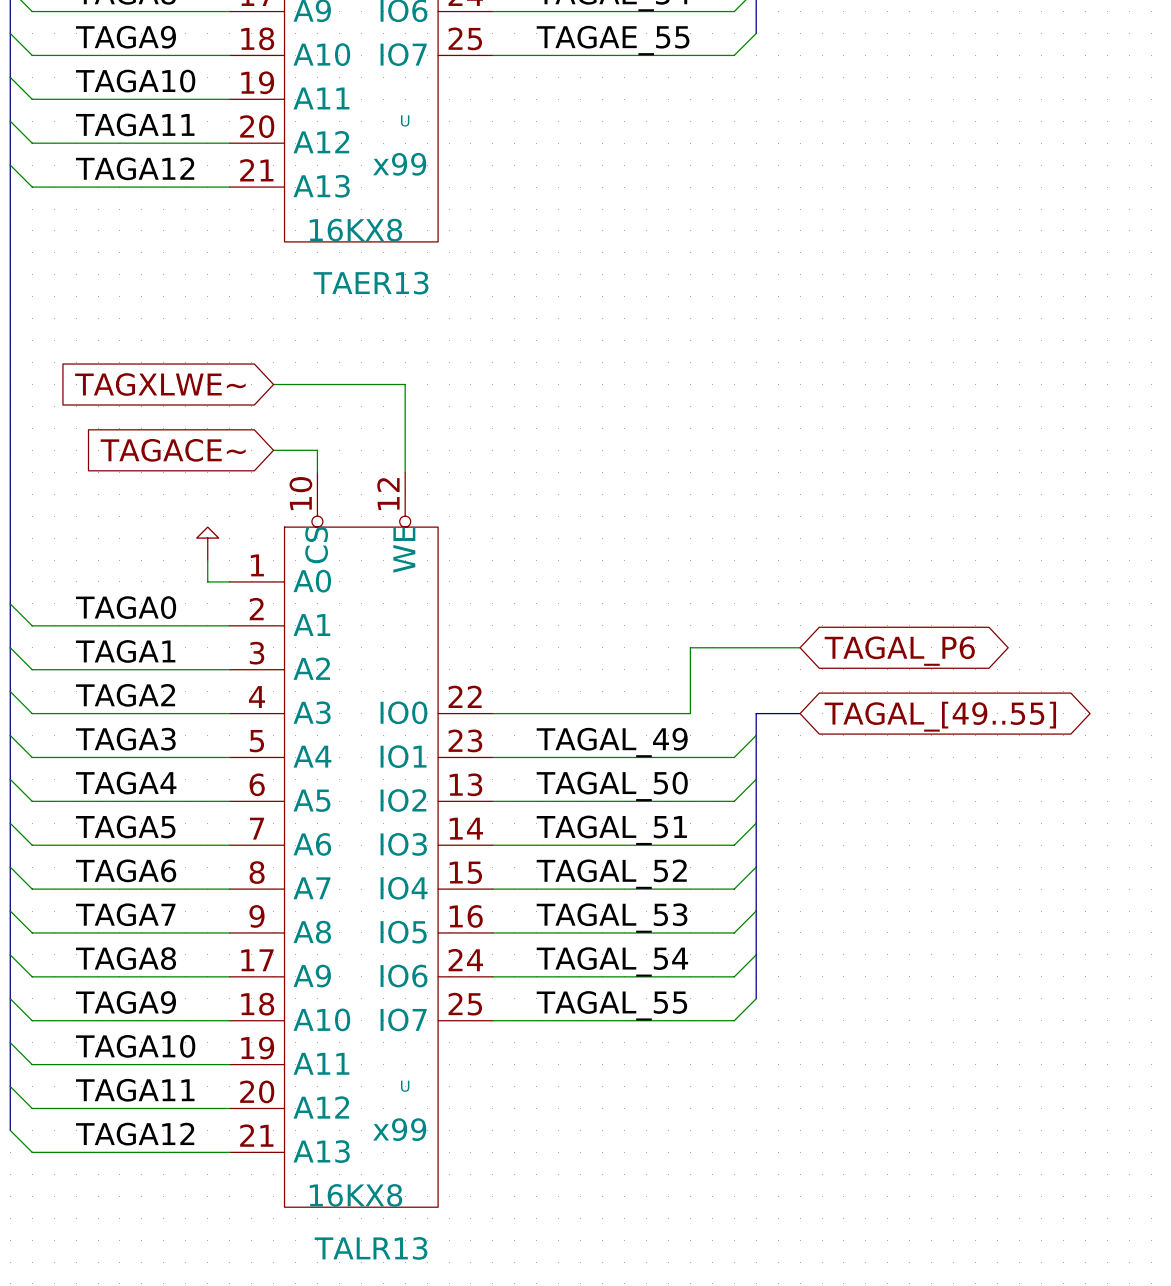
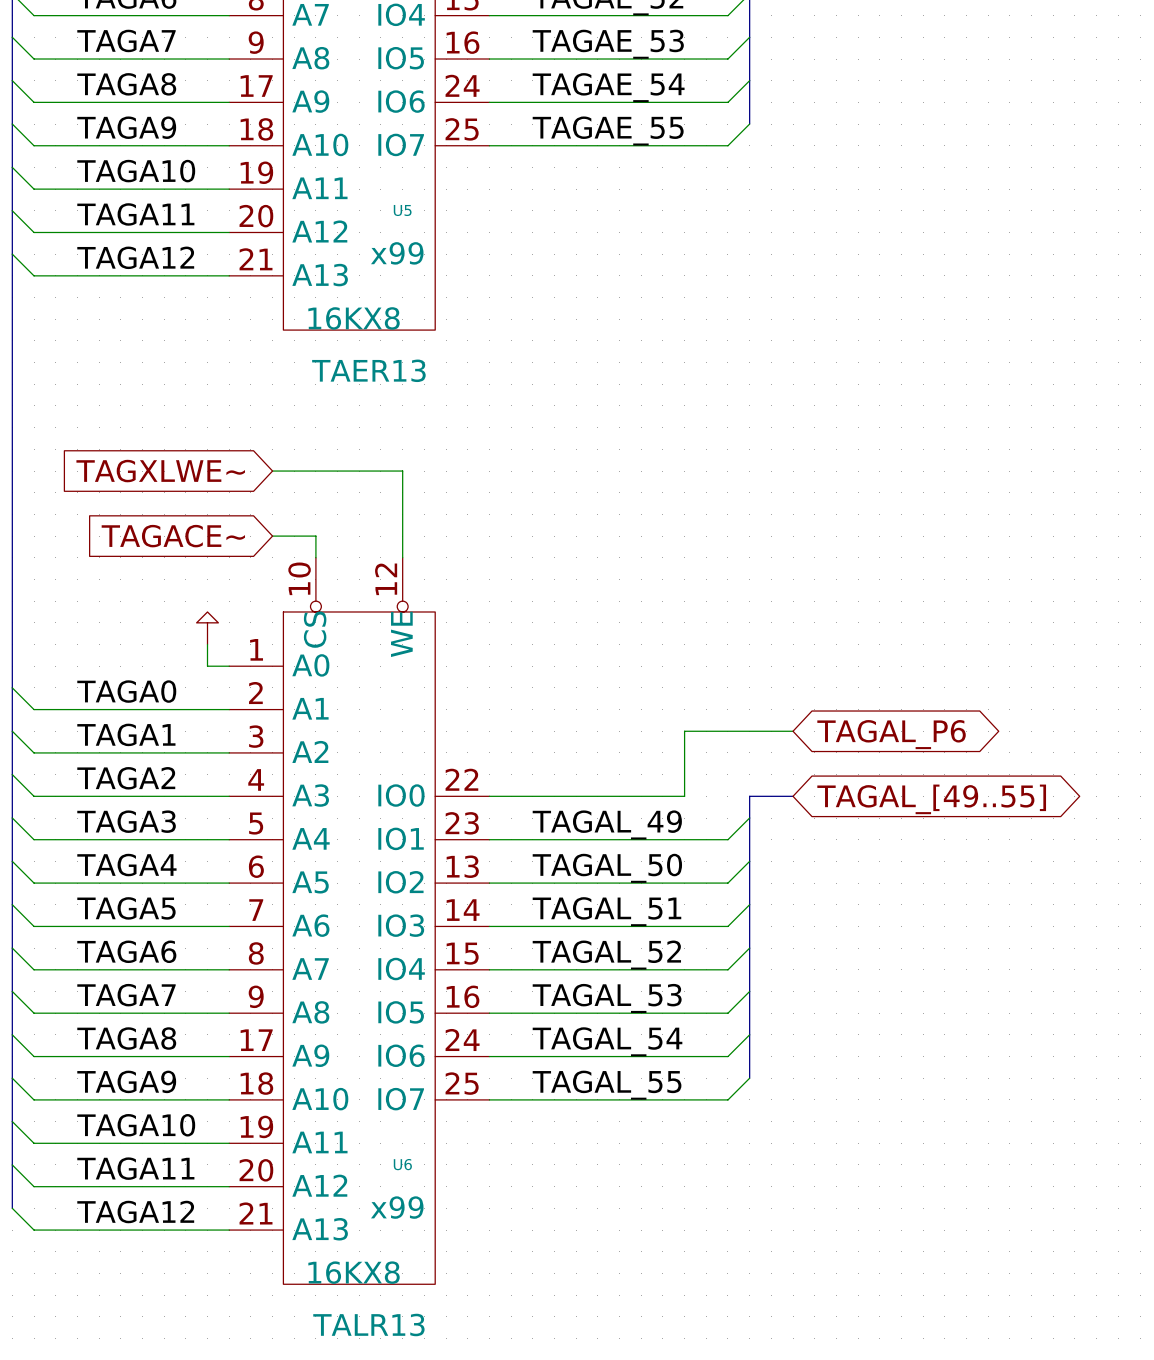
U name: U (405, 120) -> U5 (402, 210)
U name: U (405, 1086) -> U6 (402, 1164)

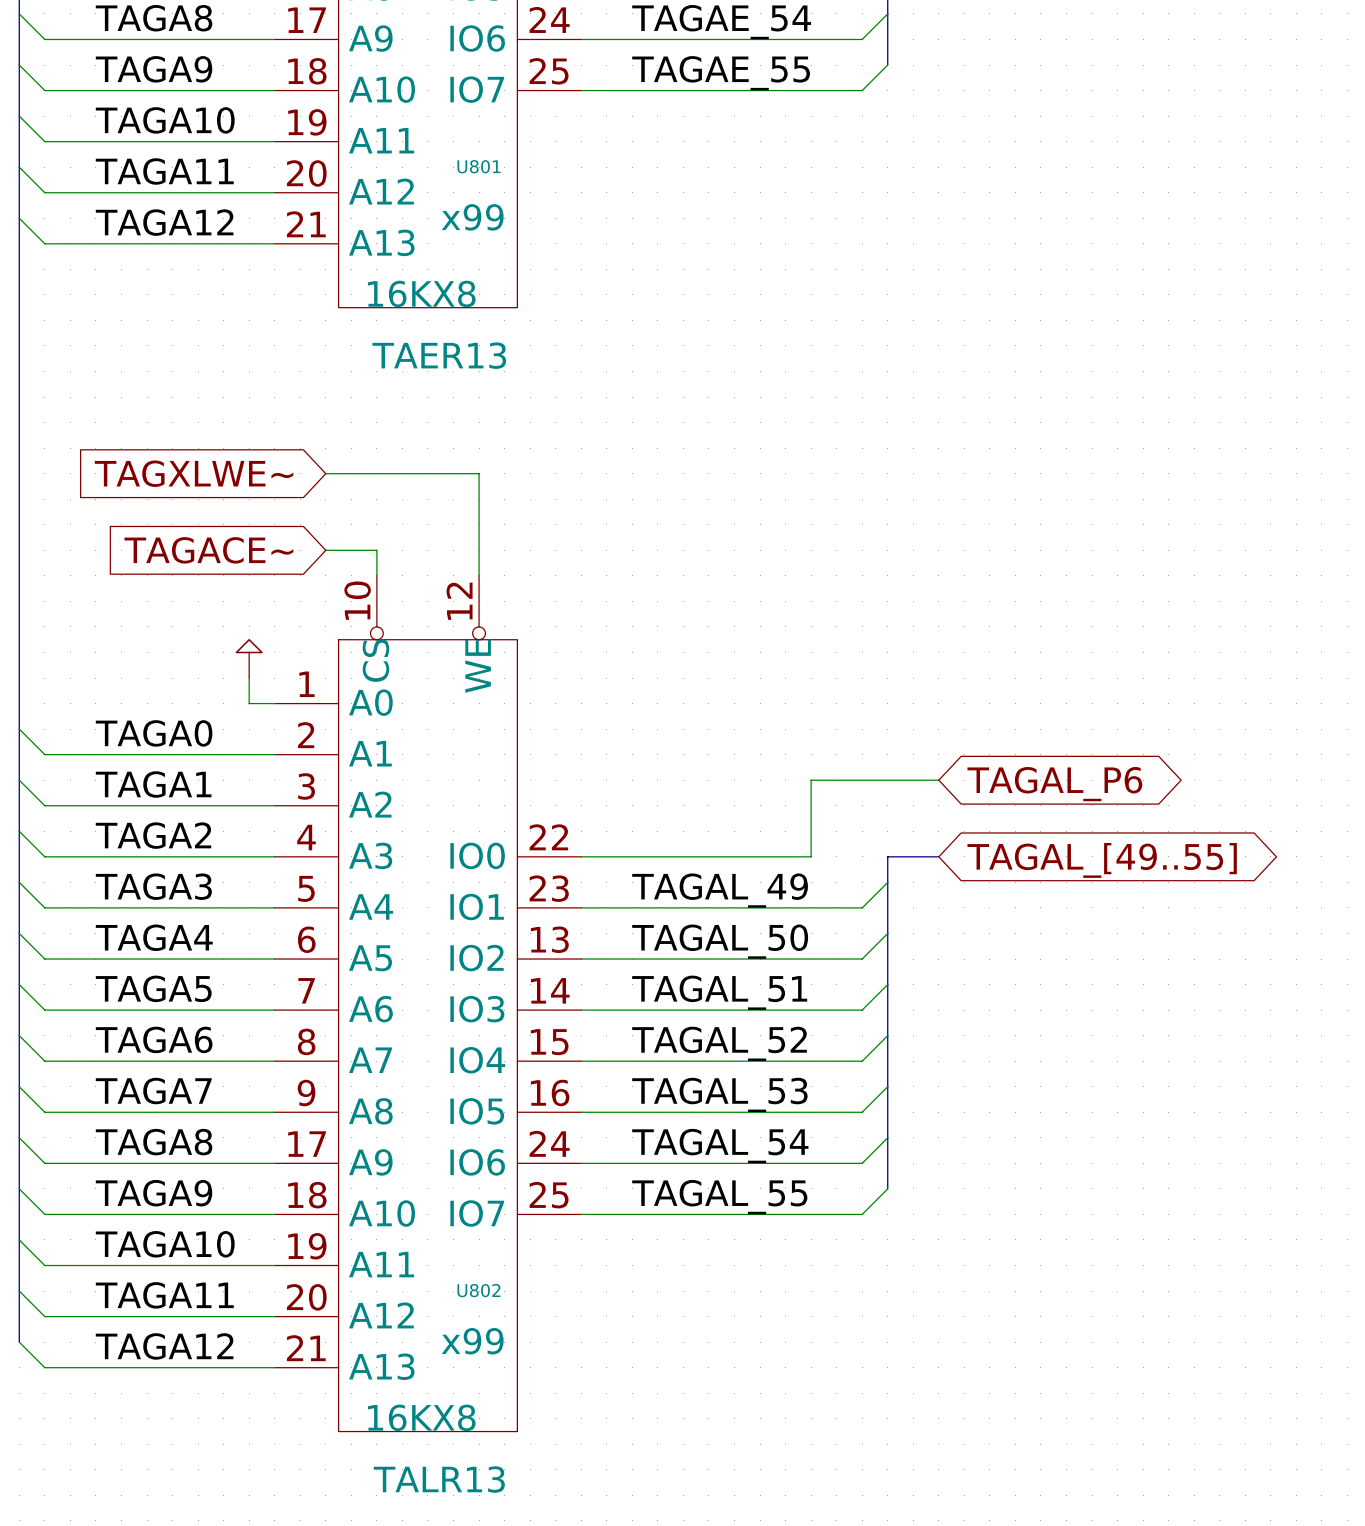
U5 name: U5 (402, 210) -> U801 (479, 166)
U6 name: U6 (402, 1164) -> U802 (478, 1290)

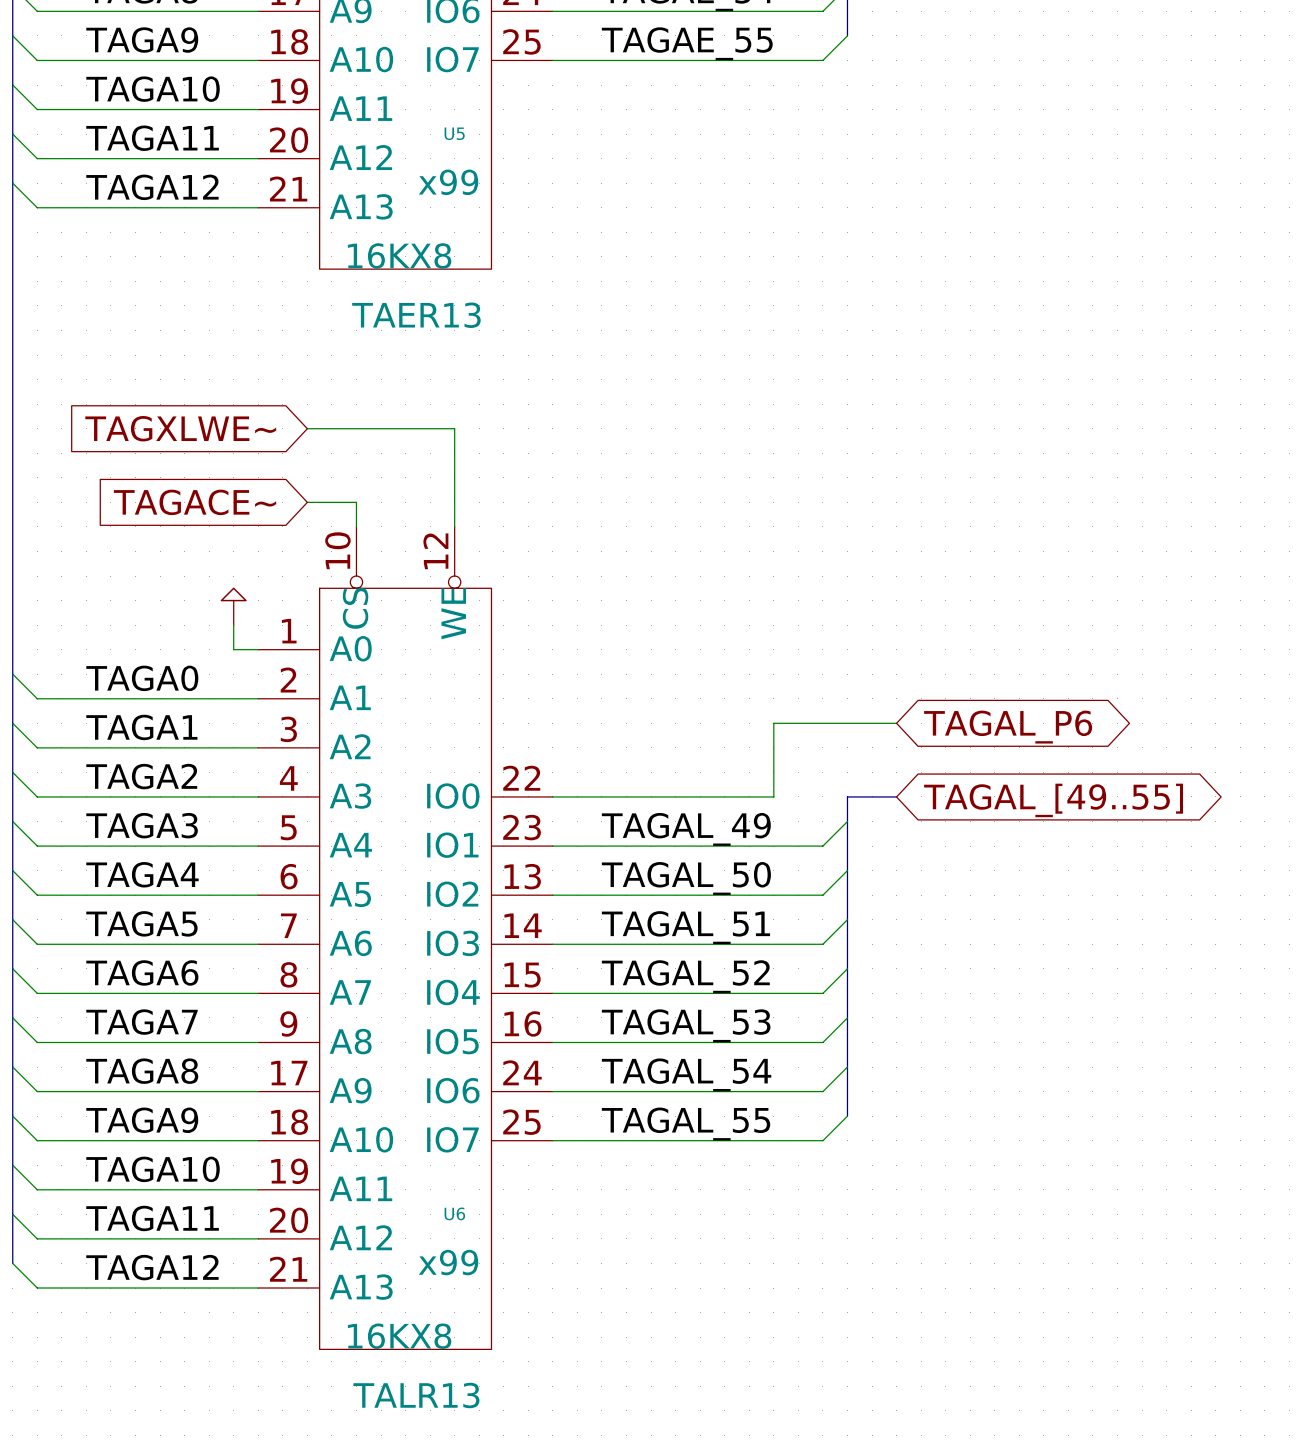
U801 name: U801 (479, 166) -> U5 (454, 133)
U802 name: U802 (478, 1290) -> U6 (454, 1213)

